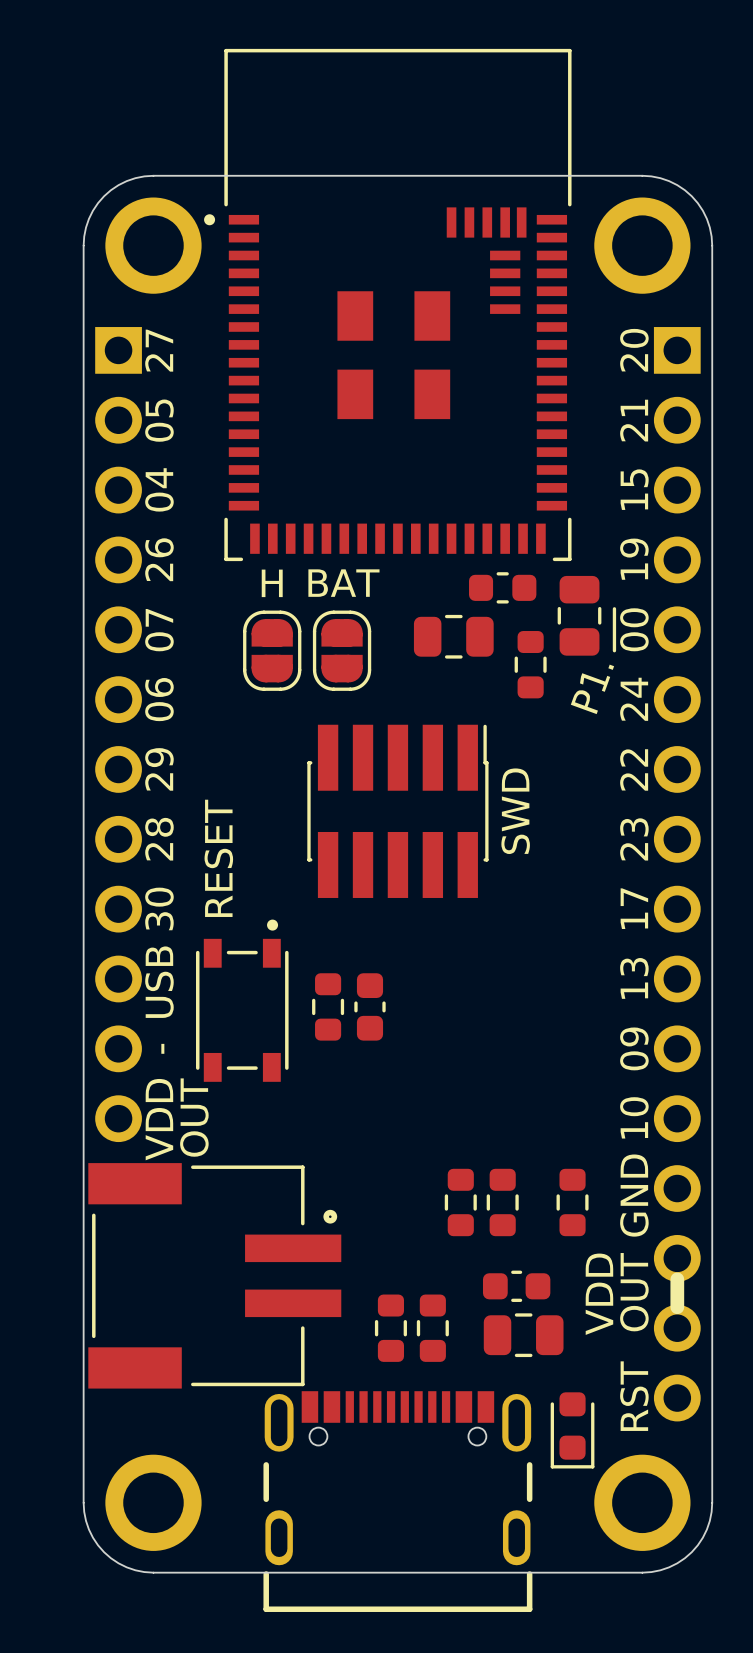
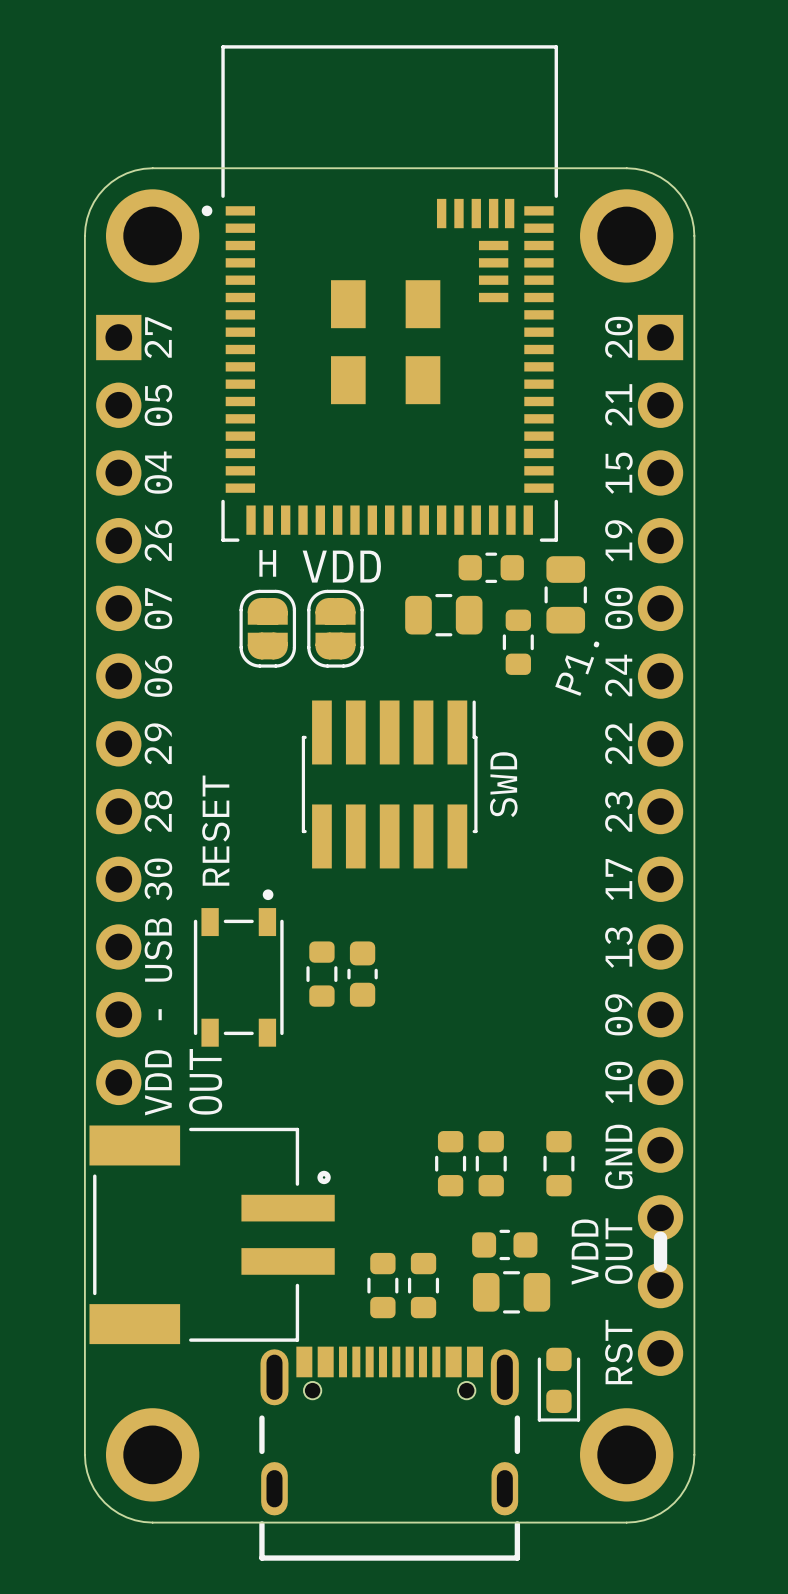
text: BAT (343, 583) -> VDD (341, 566)
line: (614, 608) (614, 650) -> none
text position: OUT (194, 1117) -> OUT (205, 1081)

